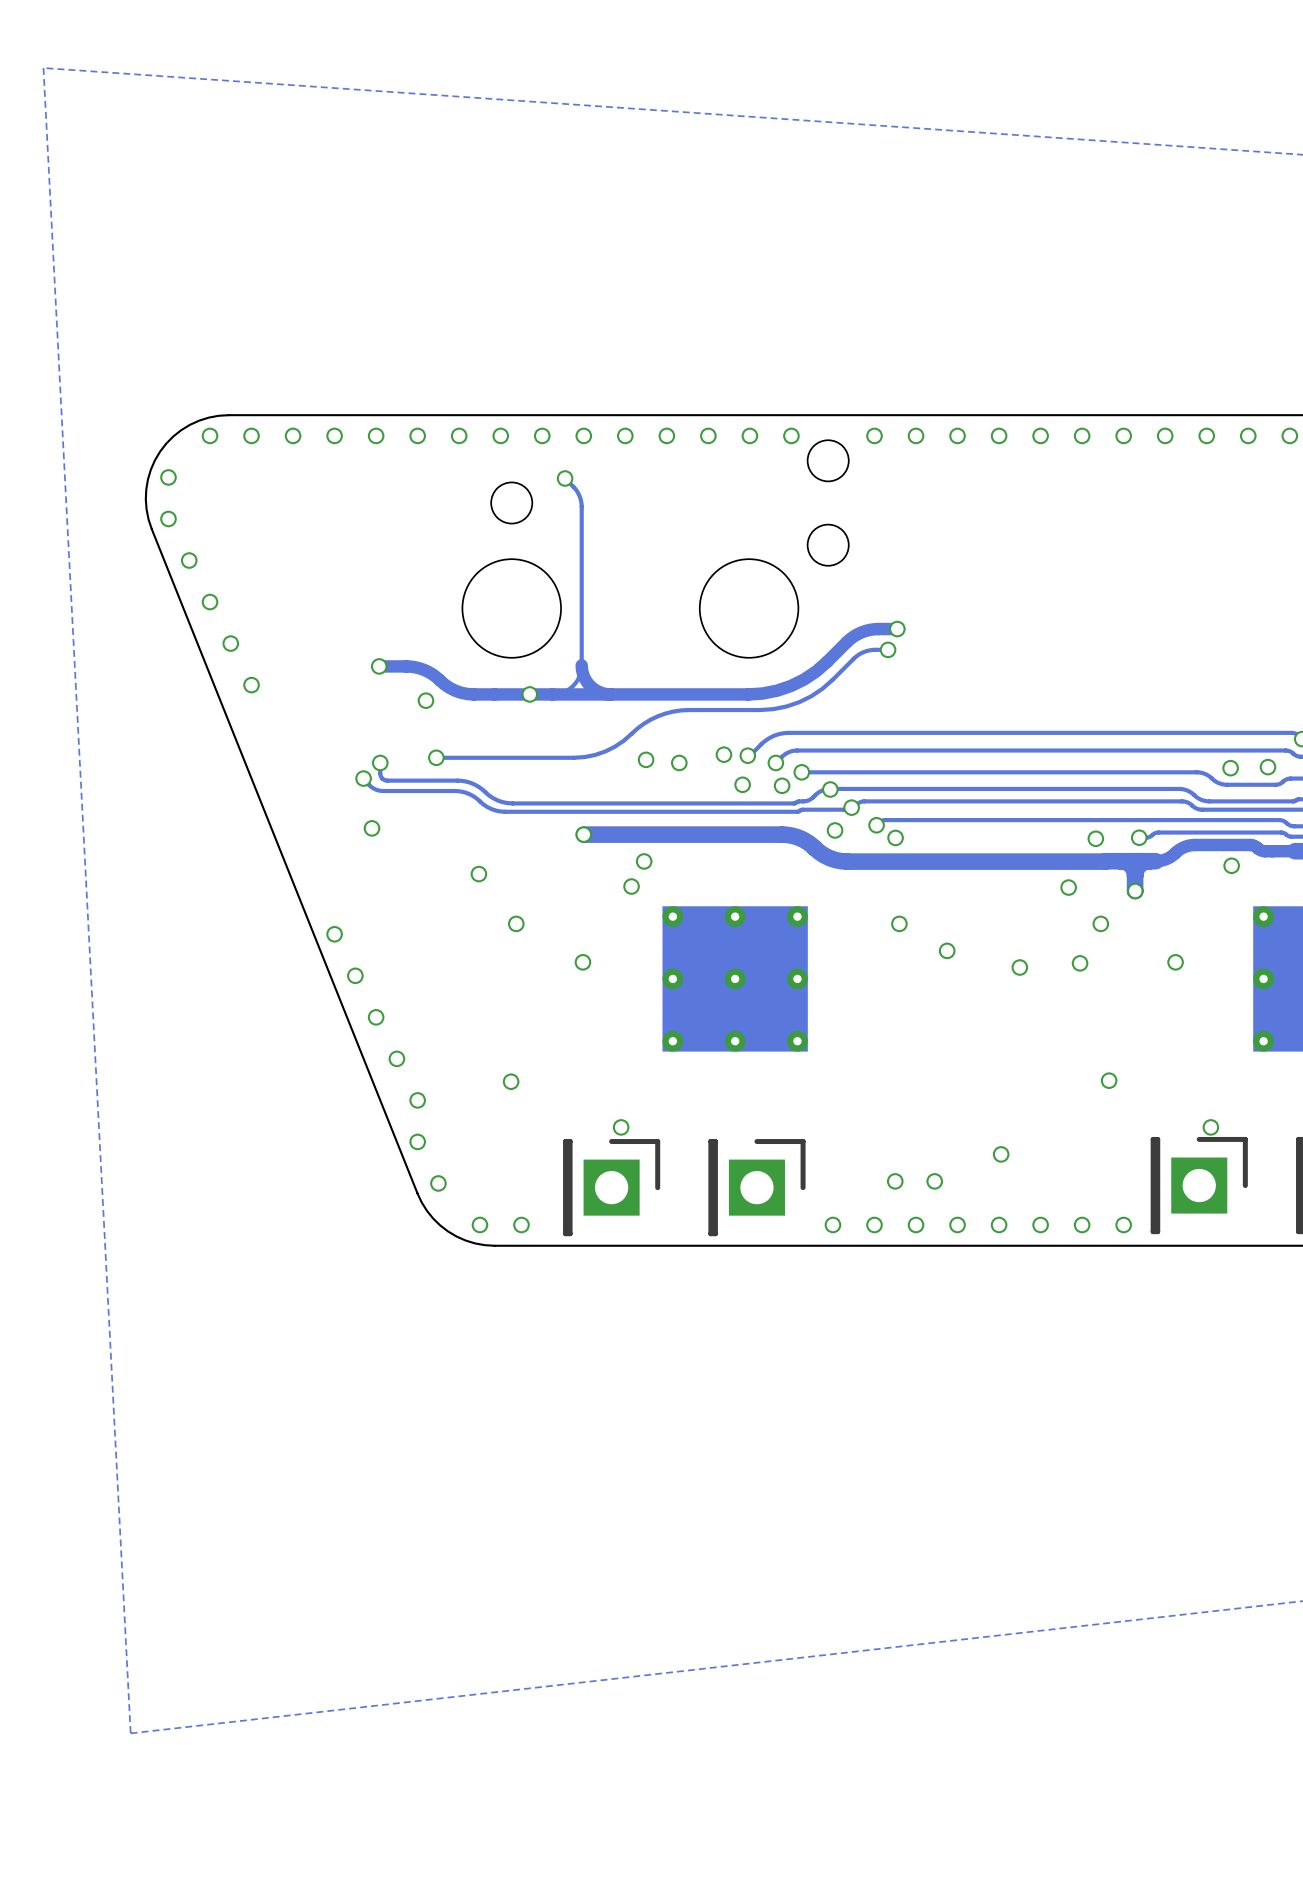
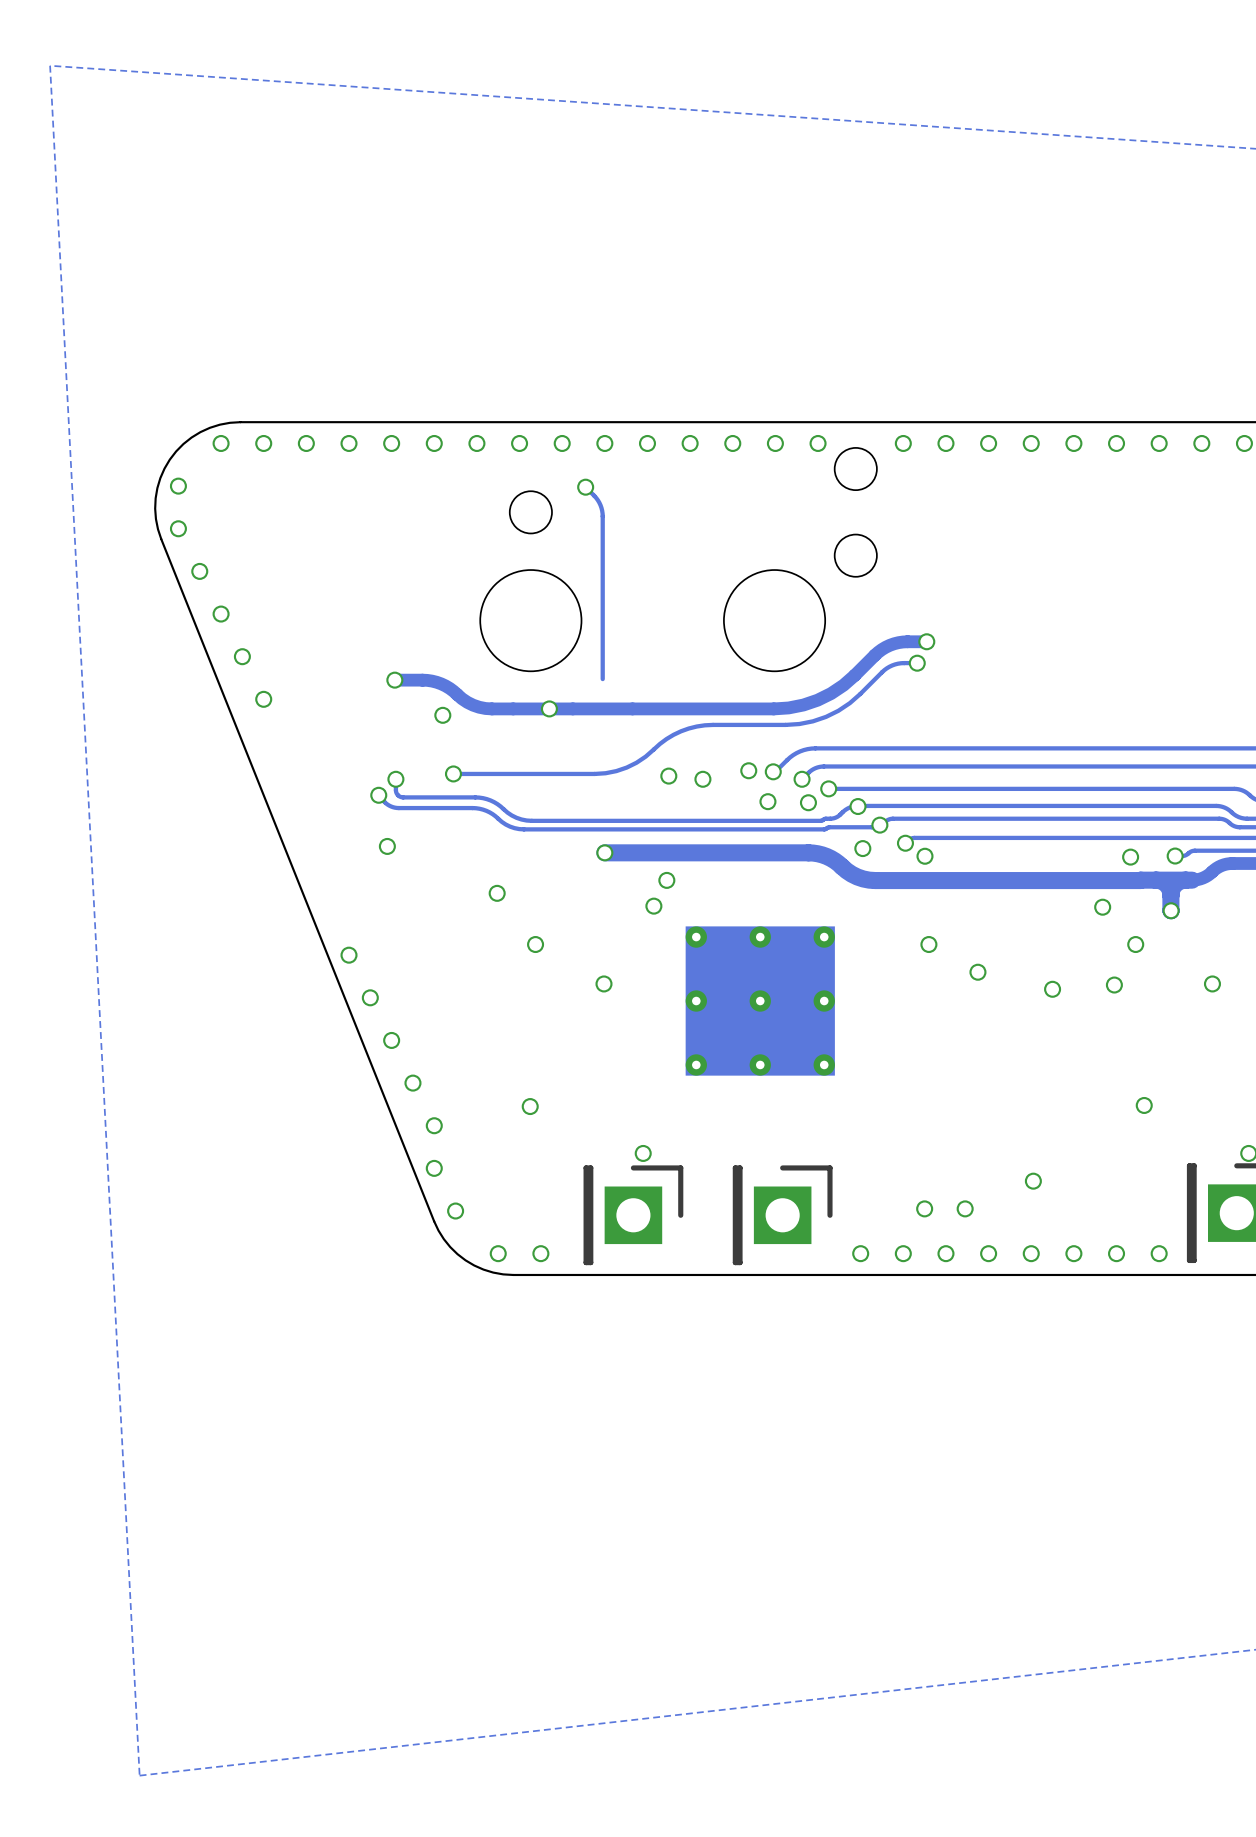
track: (610, 694) (599, 692) (590, 685) (583, 676) (581, 665) (579, 676) (573, 685) (563, 692) (552, 694) -> none

